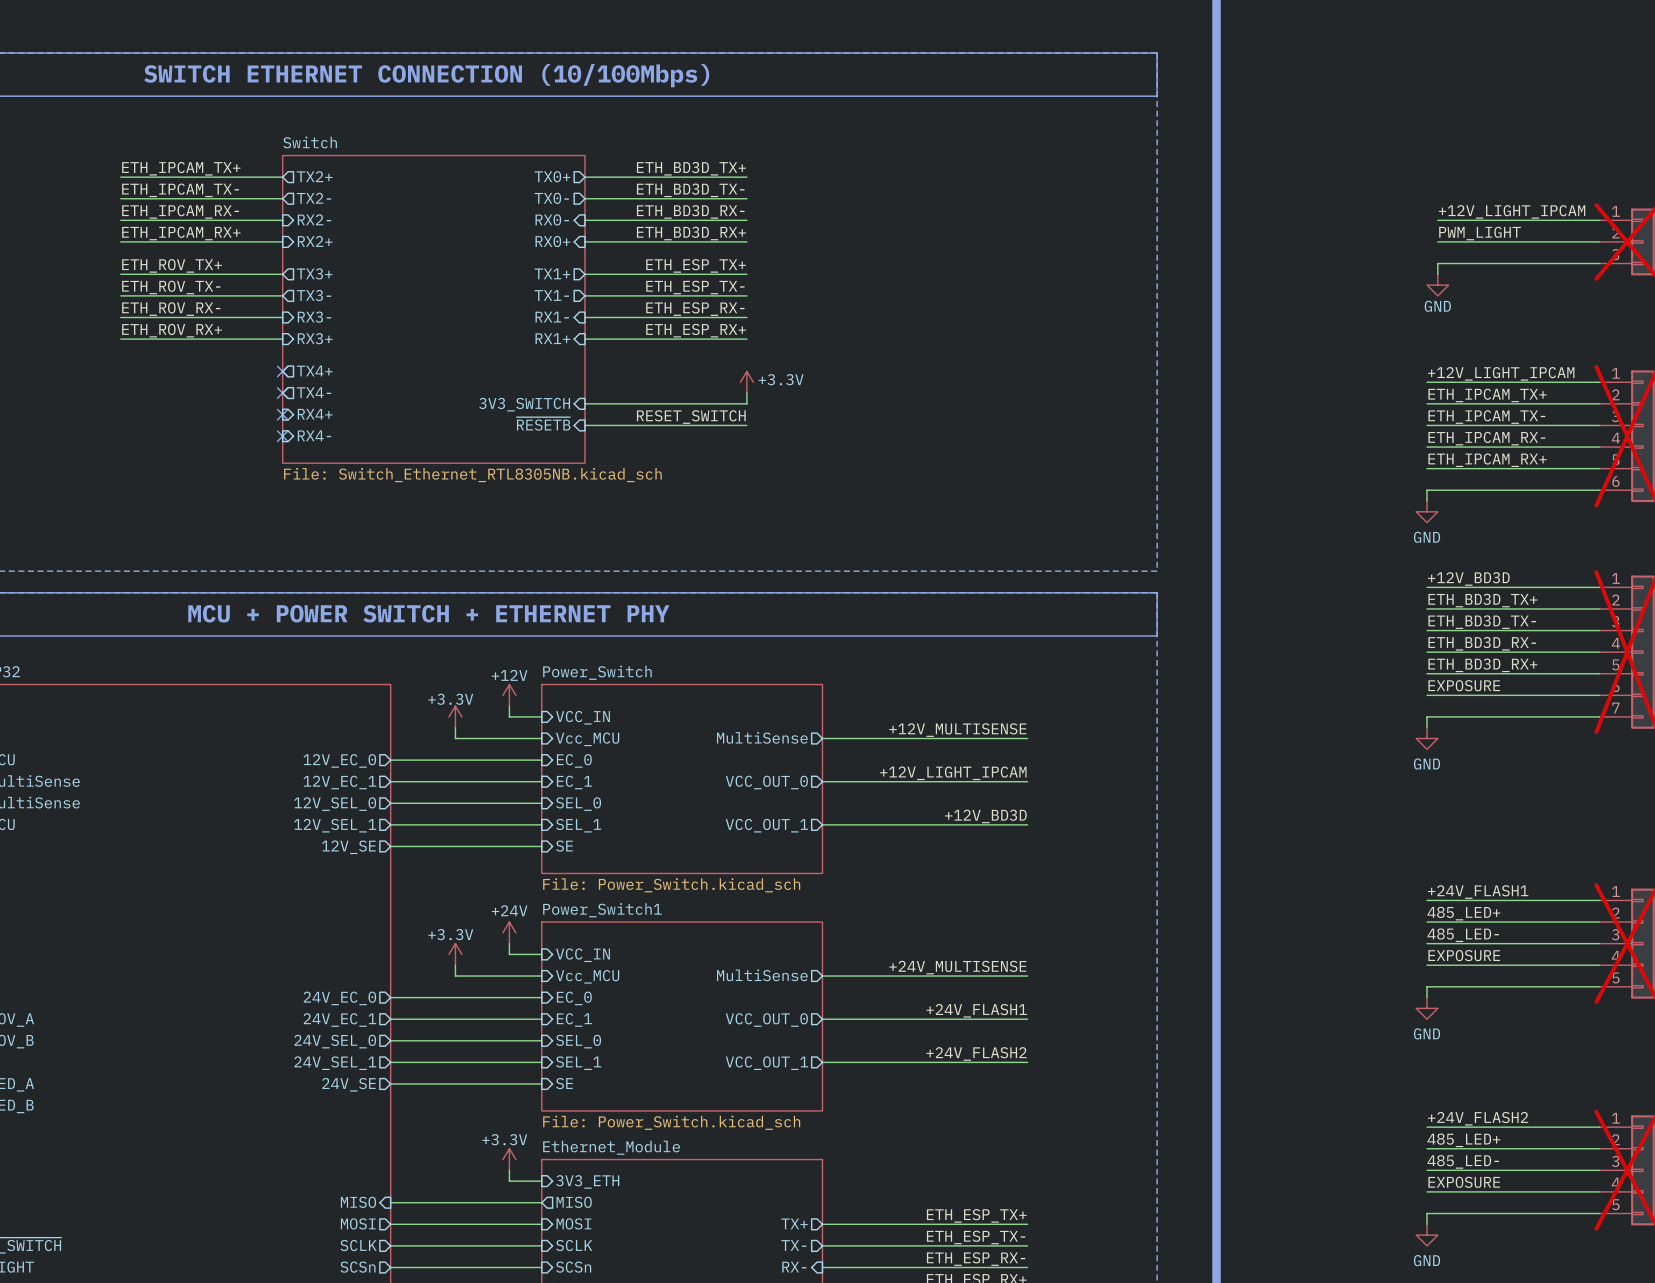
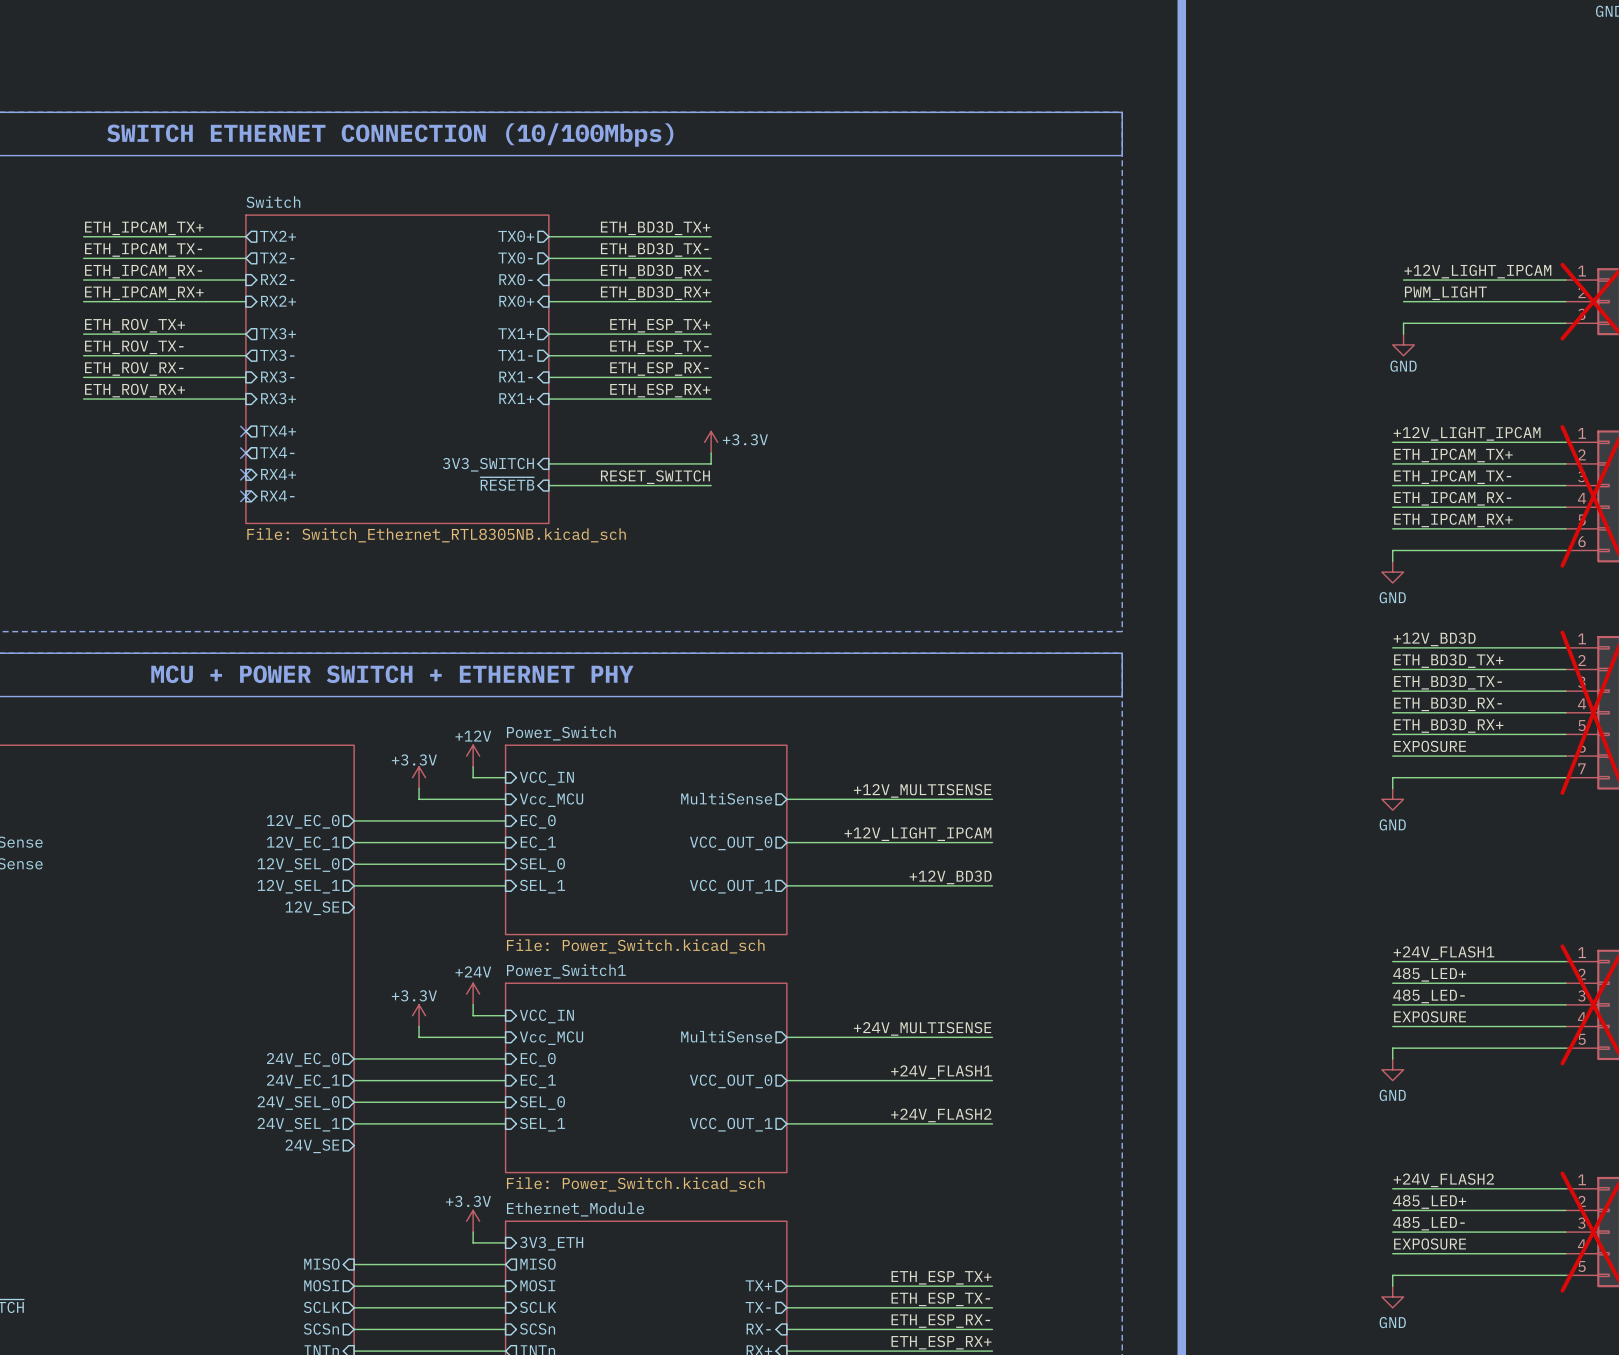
wire: (390, 846) (541, 846) -> none
sheet pin: SE (564, 846) -> none
wire: (390, 1083) (541, 1083) -> none
sheet pin: SE (564, 1083) -> none

